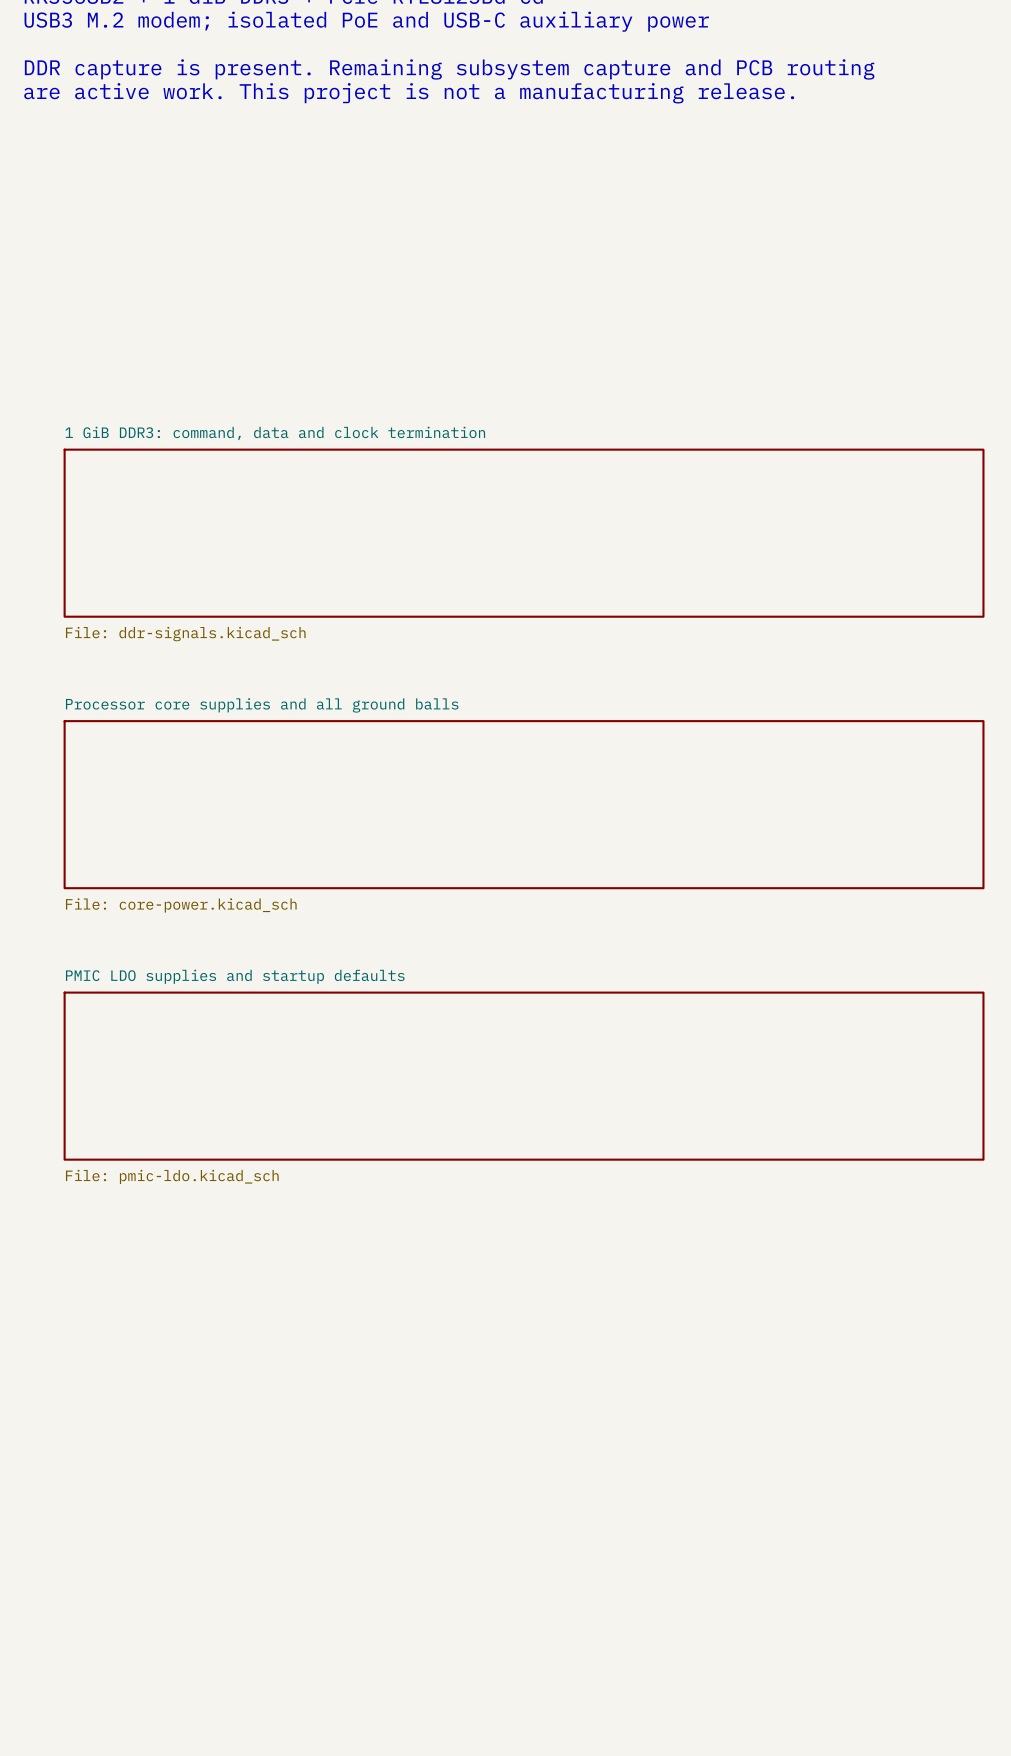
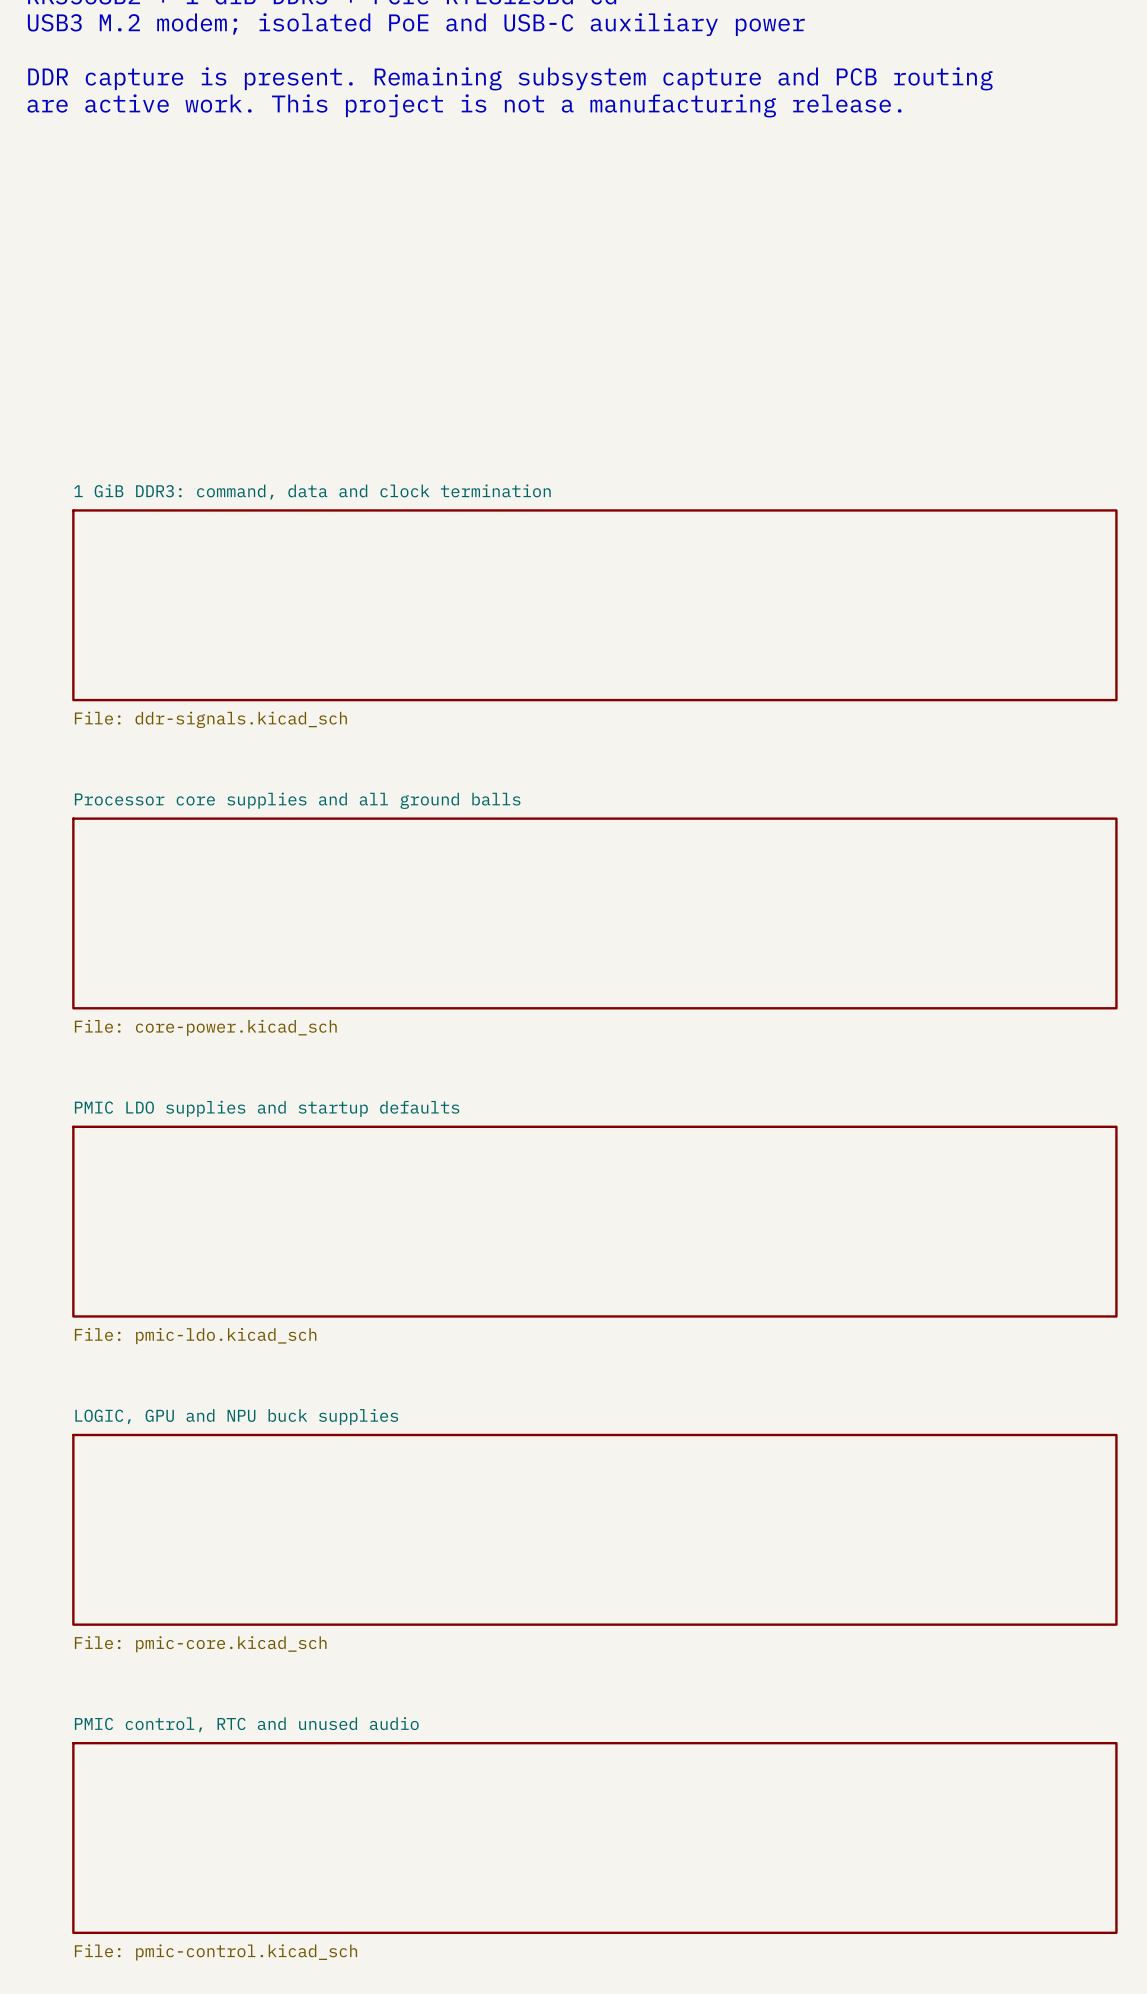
sheet LOGIC, GPU and NPU buck supplies: none -> File: pmic-core.kicad_sch (594, 1529)
sheet PMIC control, RTC and unused audio: none -> File: pmic-control.kicad_sch (594, 1838)

